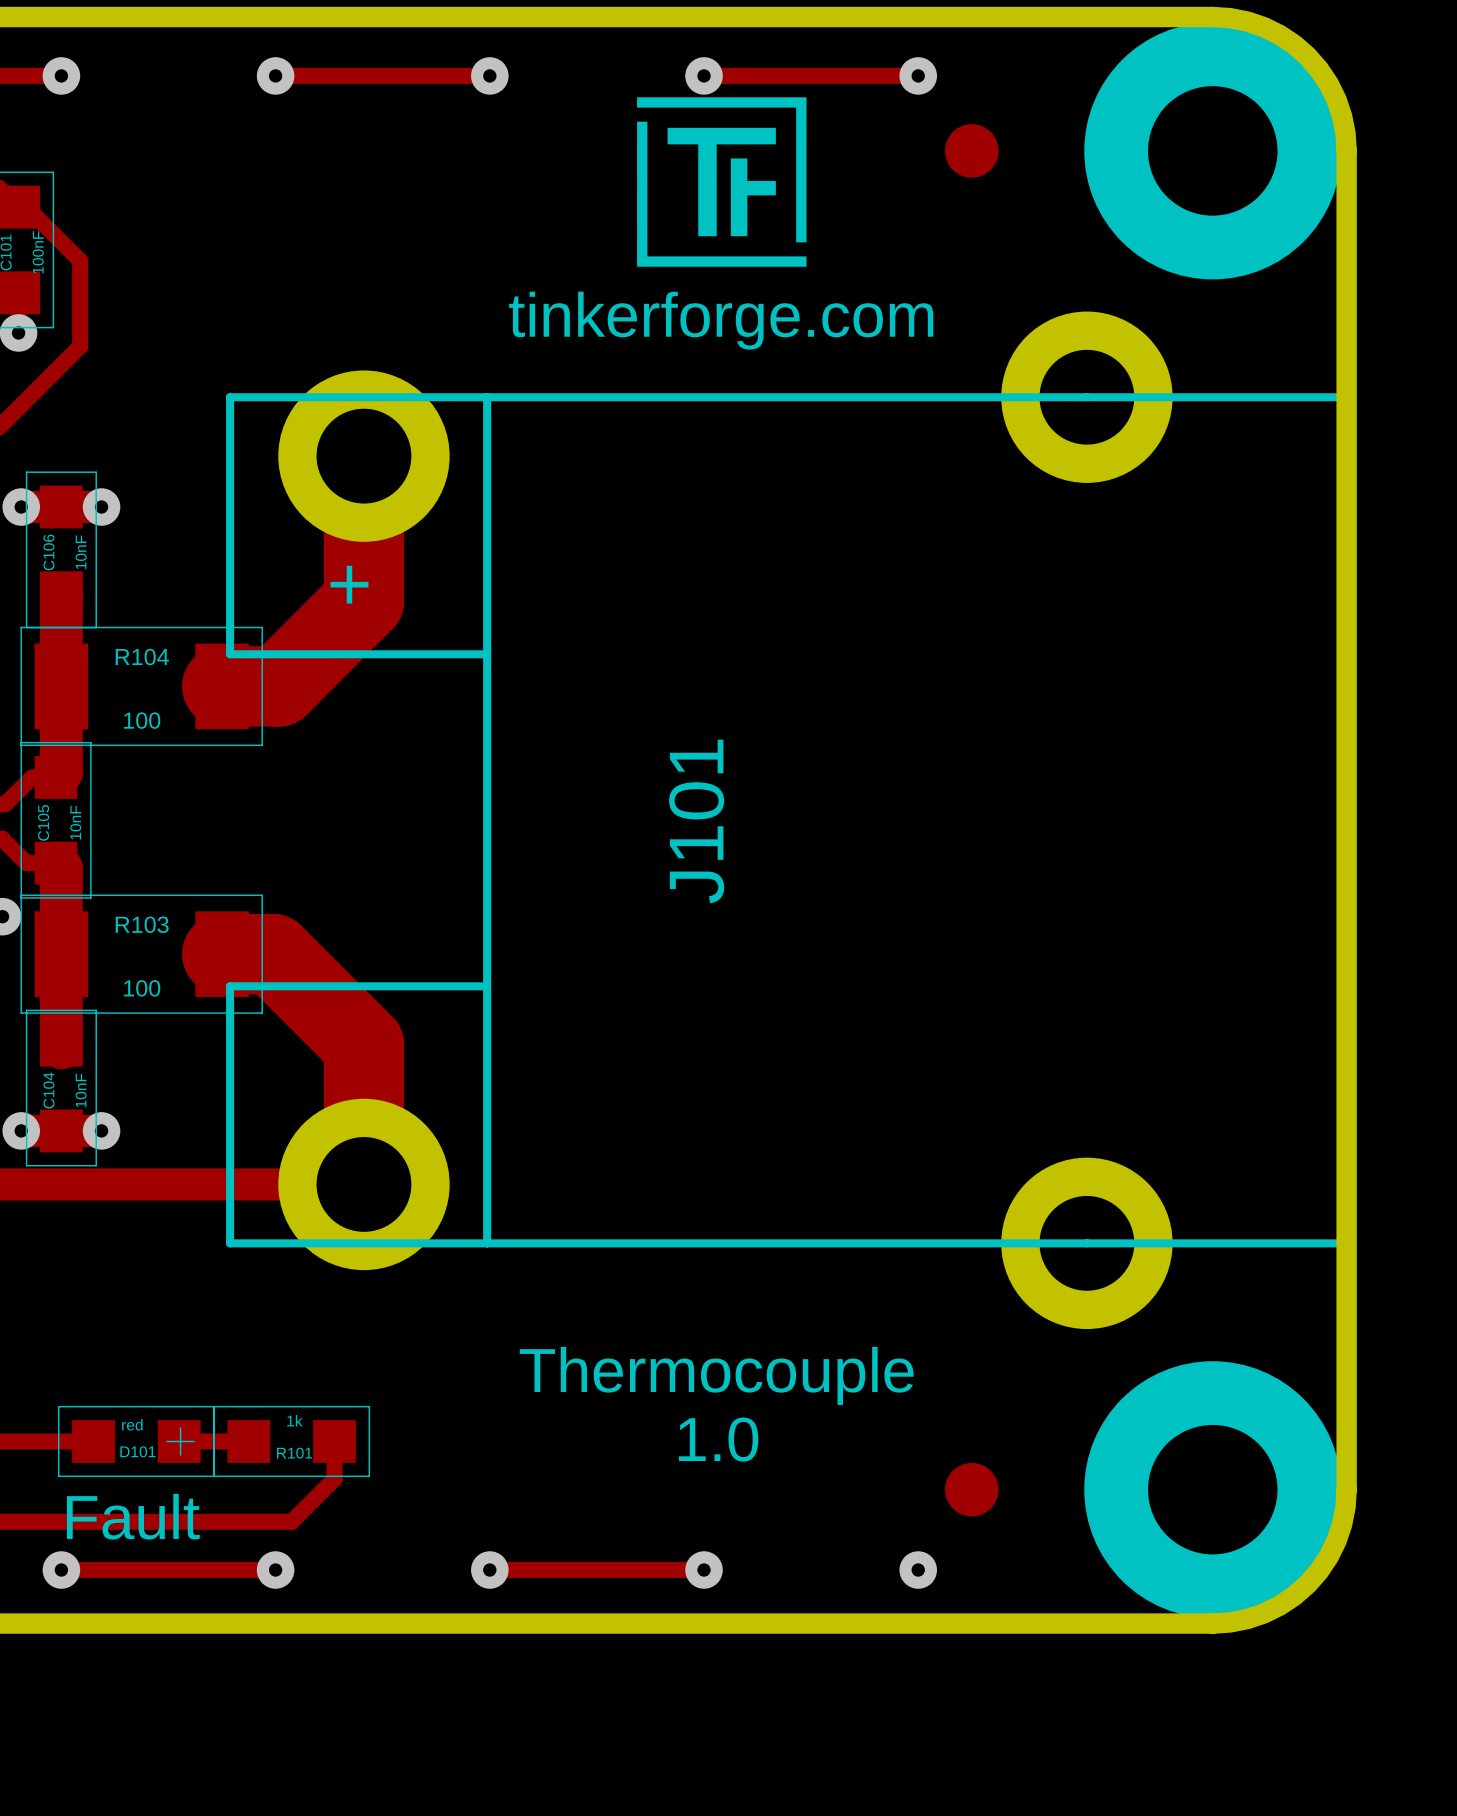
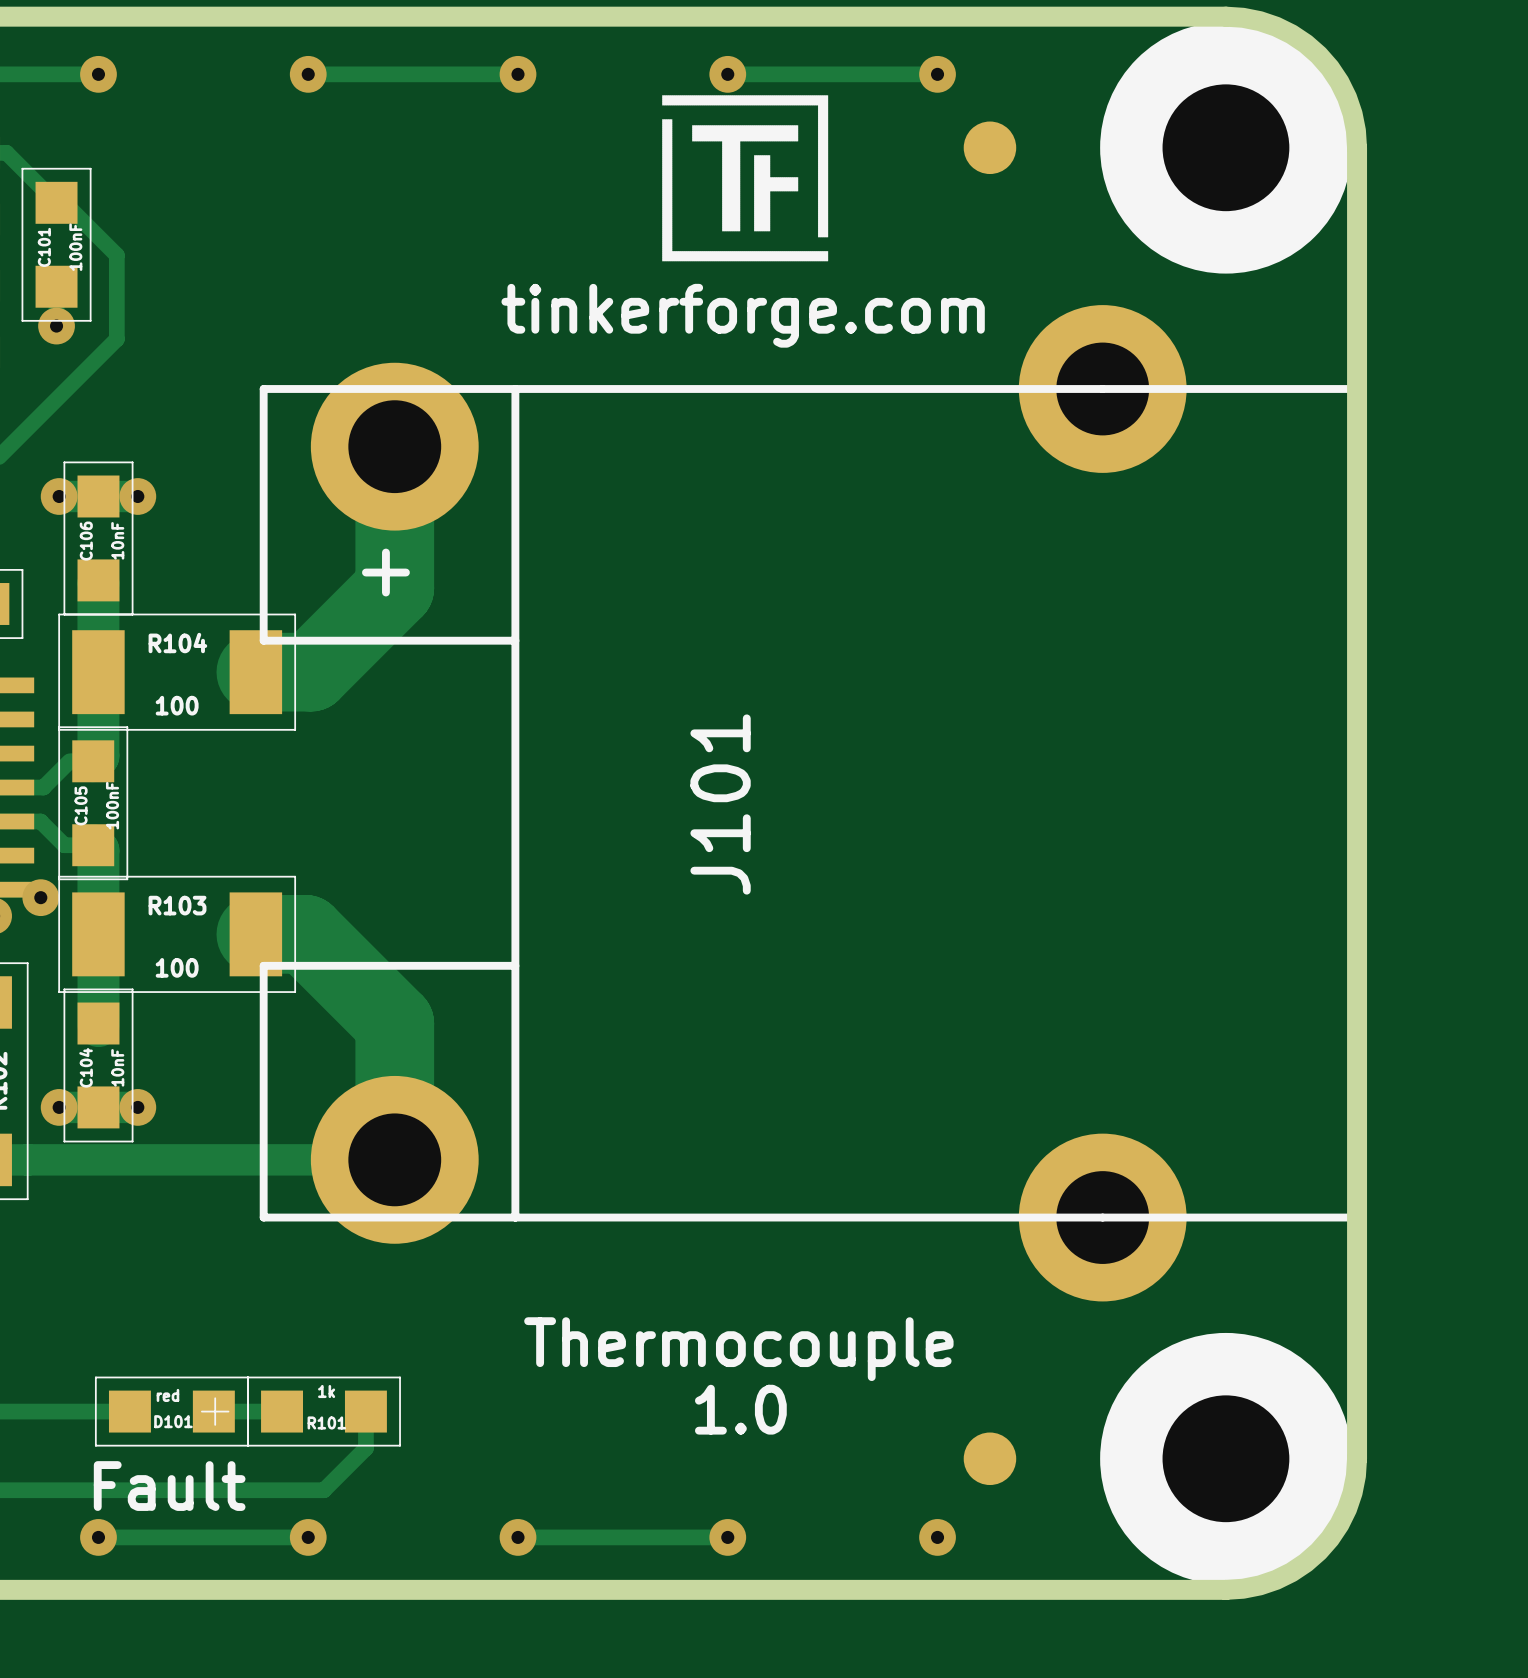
C105 value: 10nF (75, 822) -> 100nF (112, 805)

